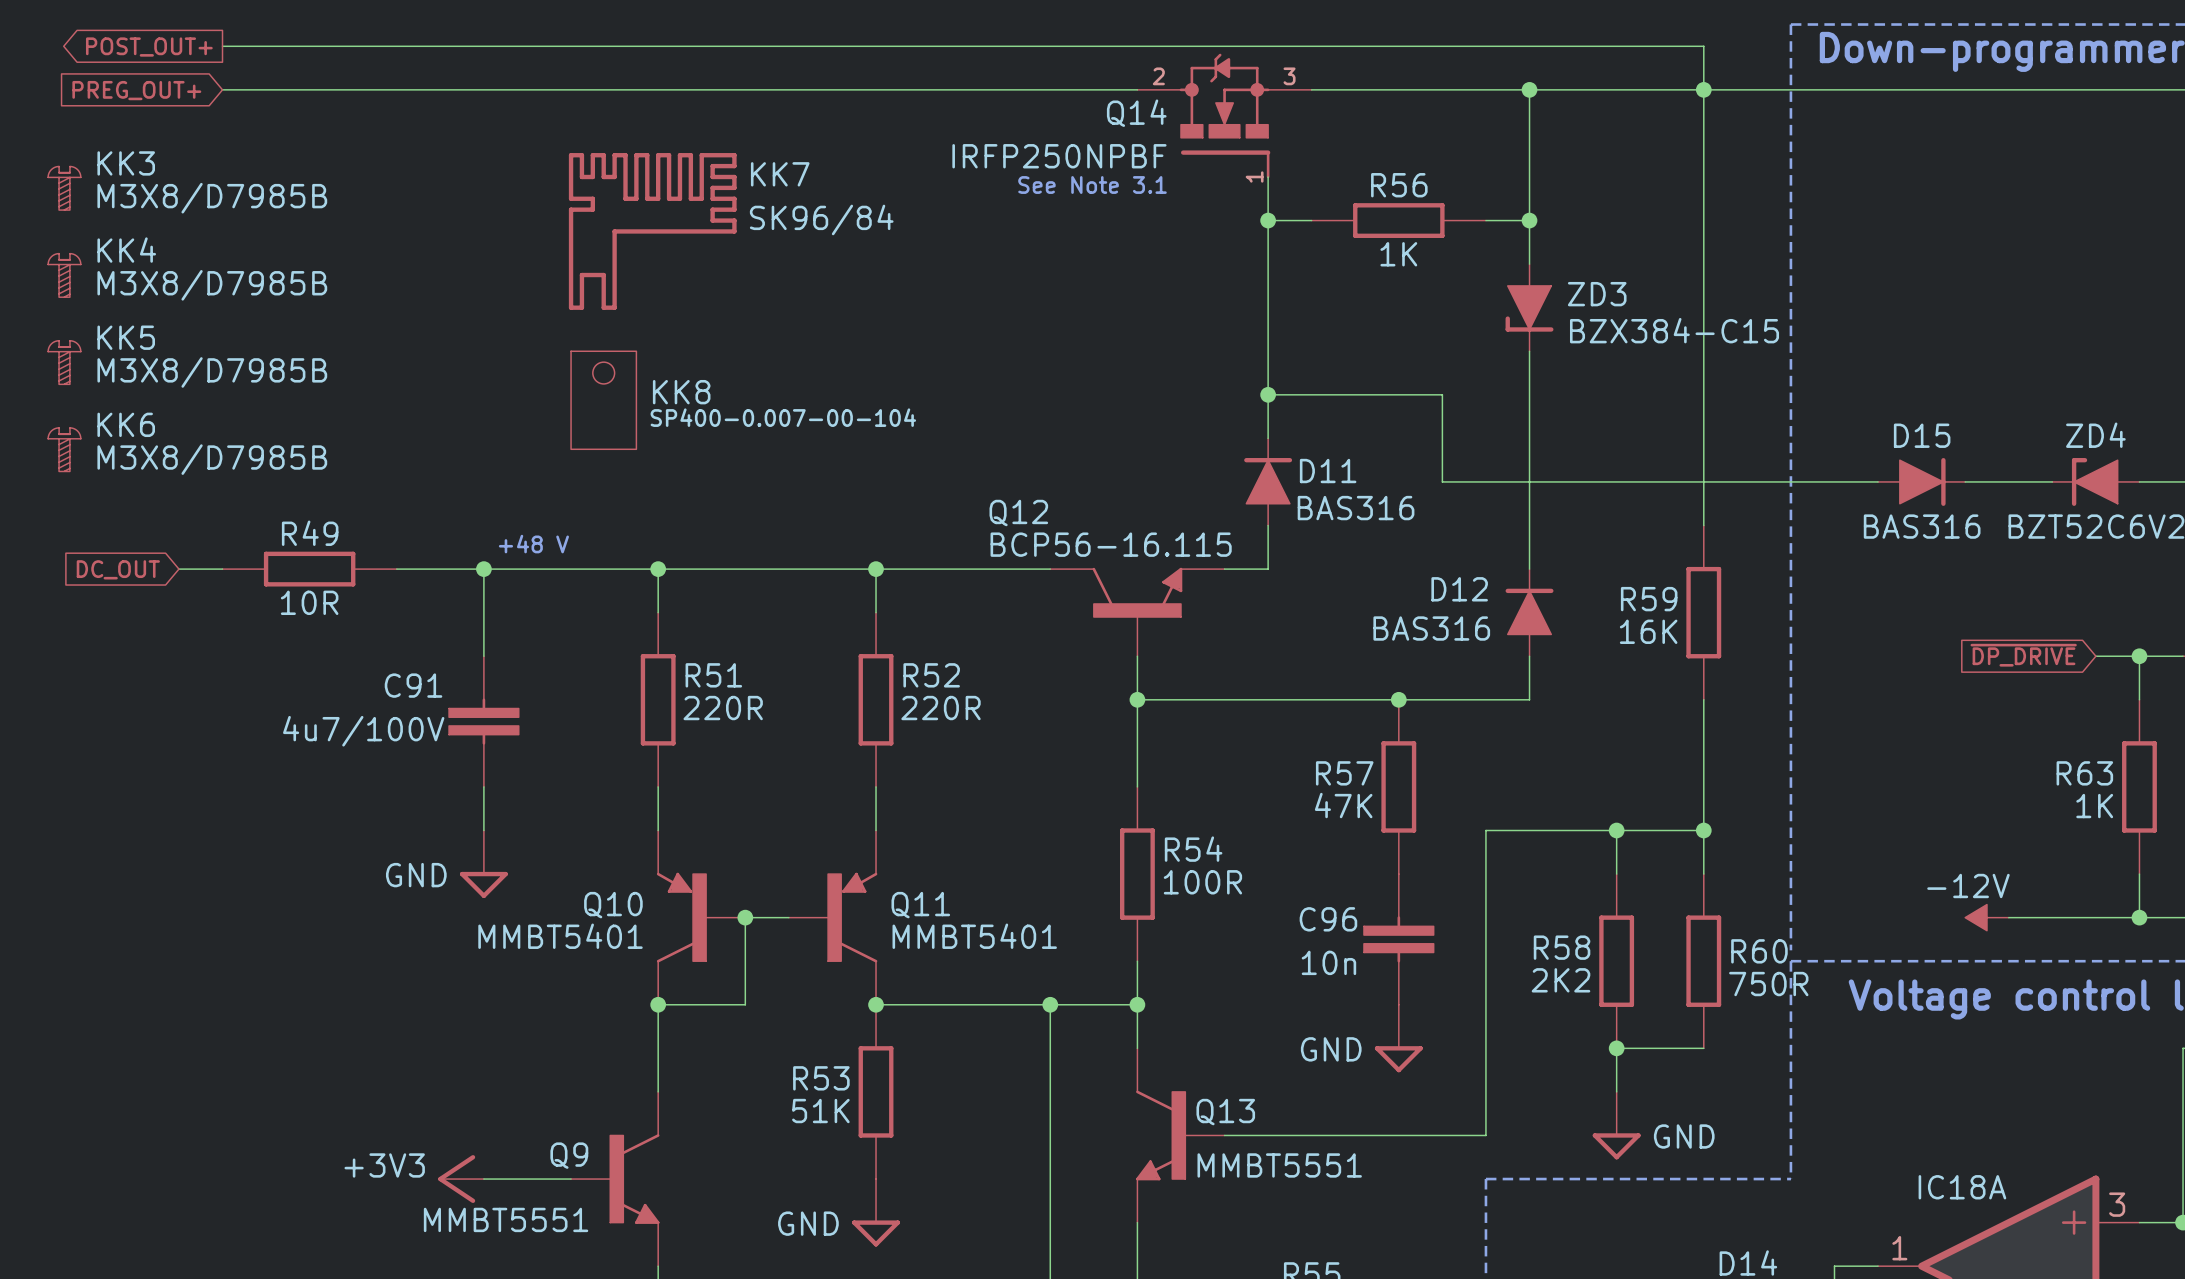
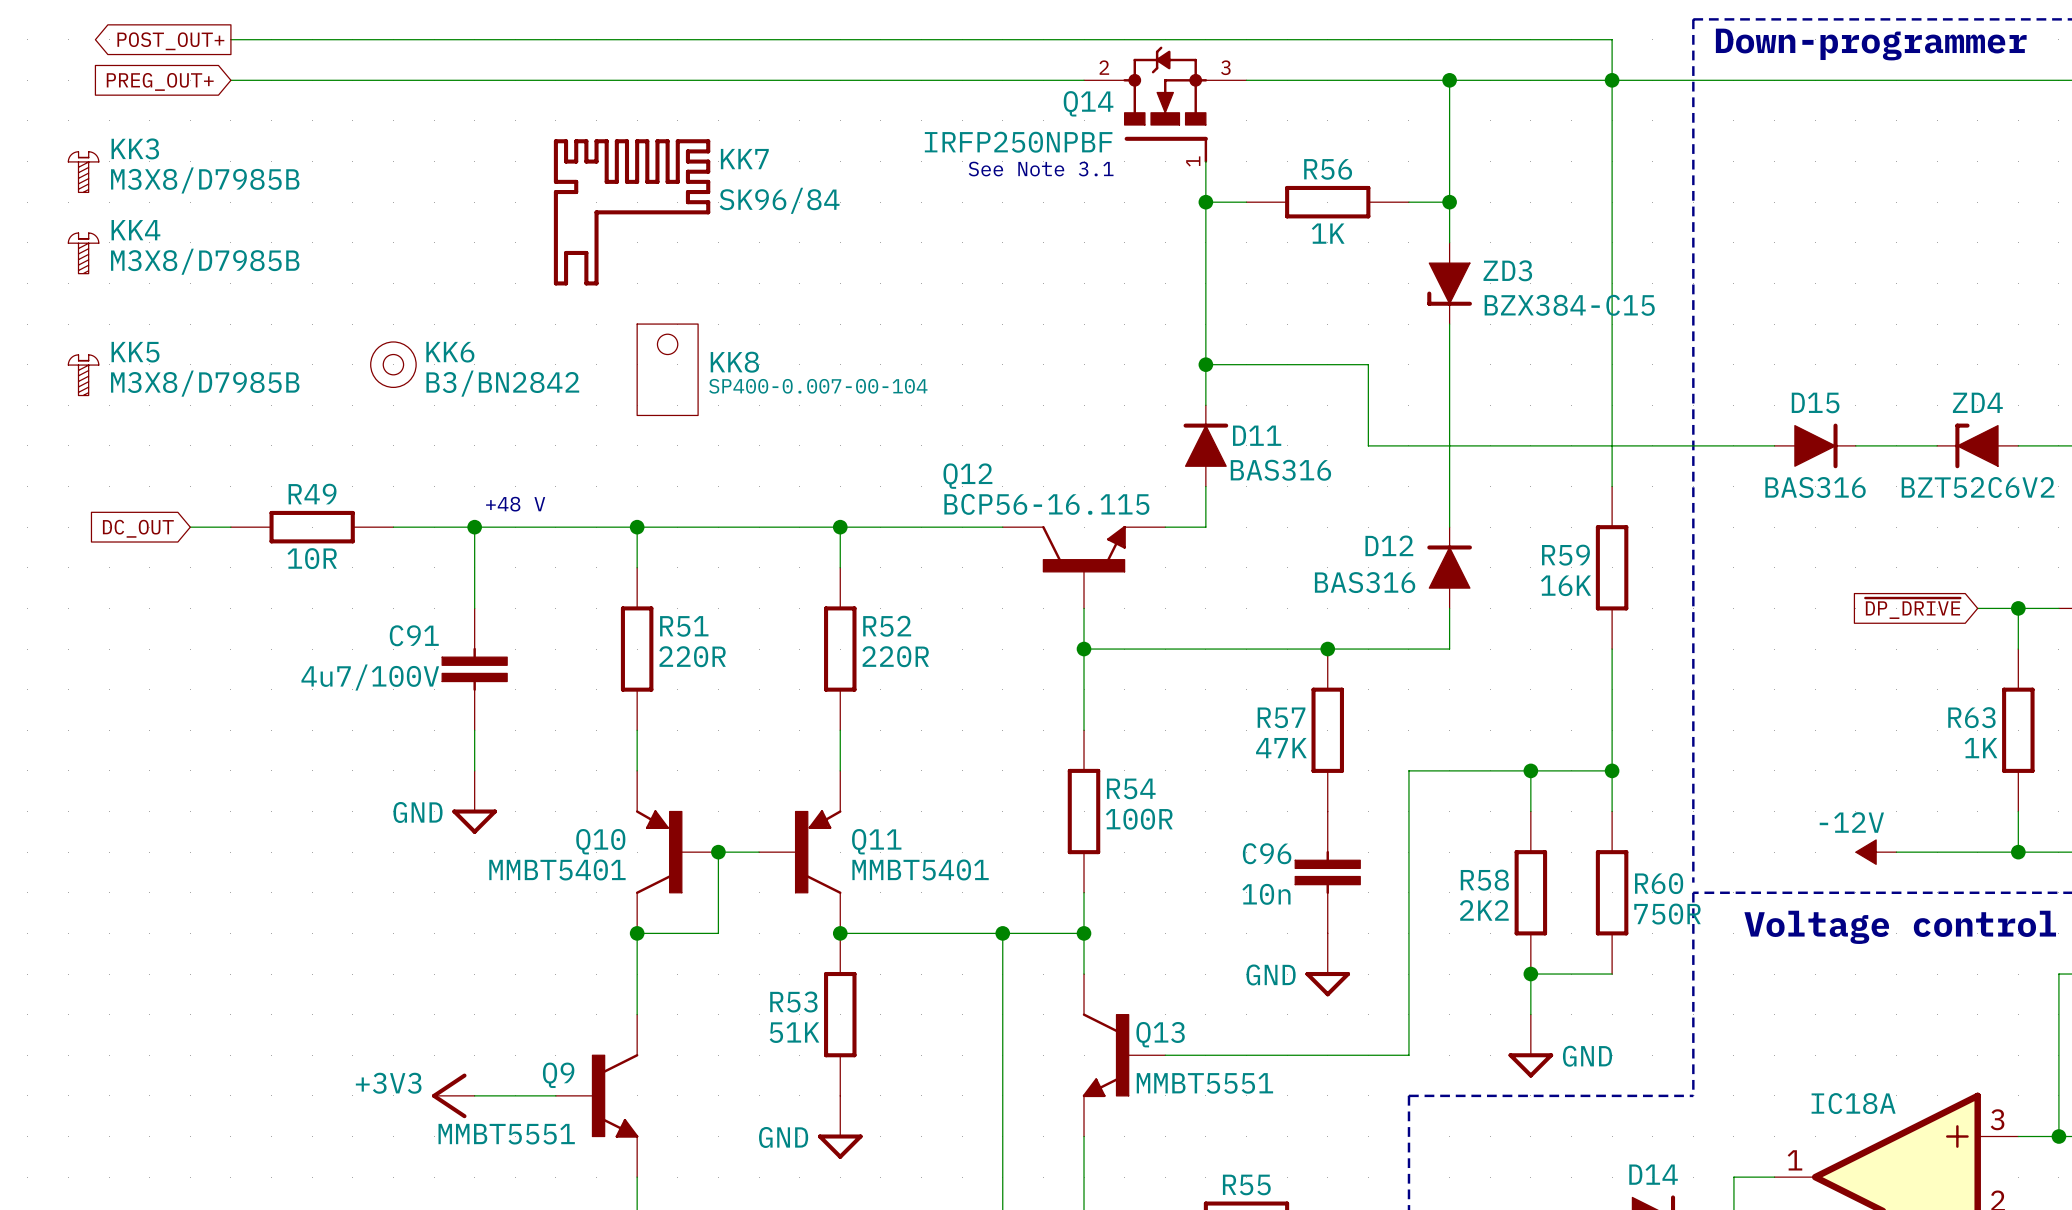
KK5 position: (64, 362) -> (83, 375)
KK8 position: (603, 400) -> (667, 369)
KK6 symbol: [48, 427, 81, 472] -> [370, 341, 417, 388]
KK6 value: M3X8/D7985B (212, 459) -> B3/BN2842 (502, 383)

